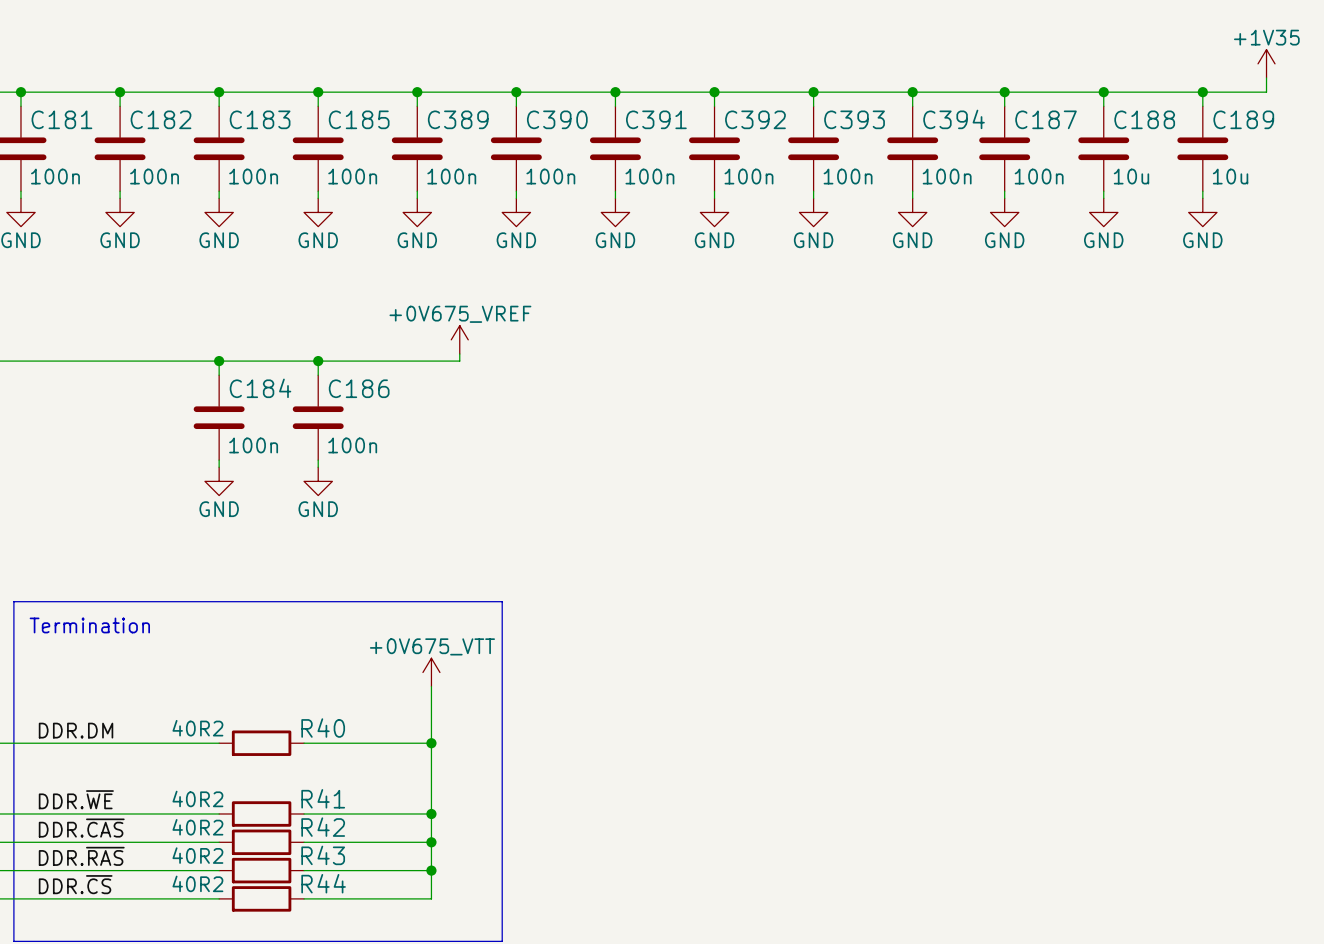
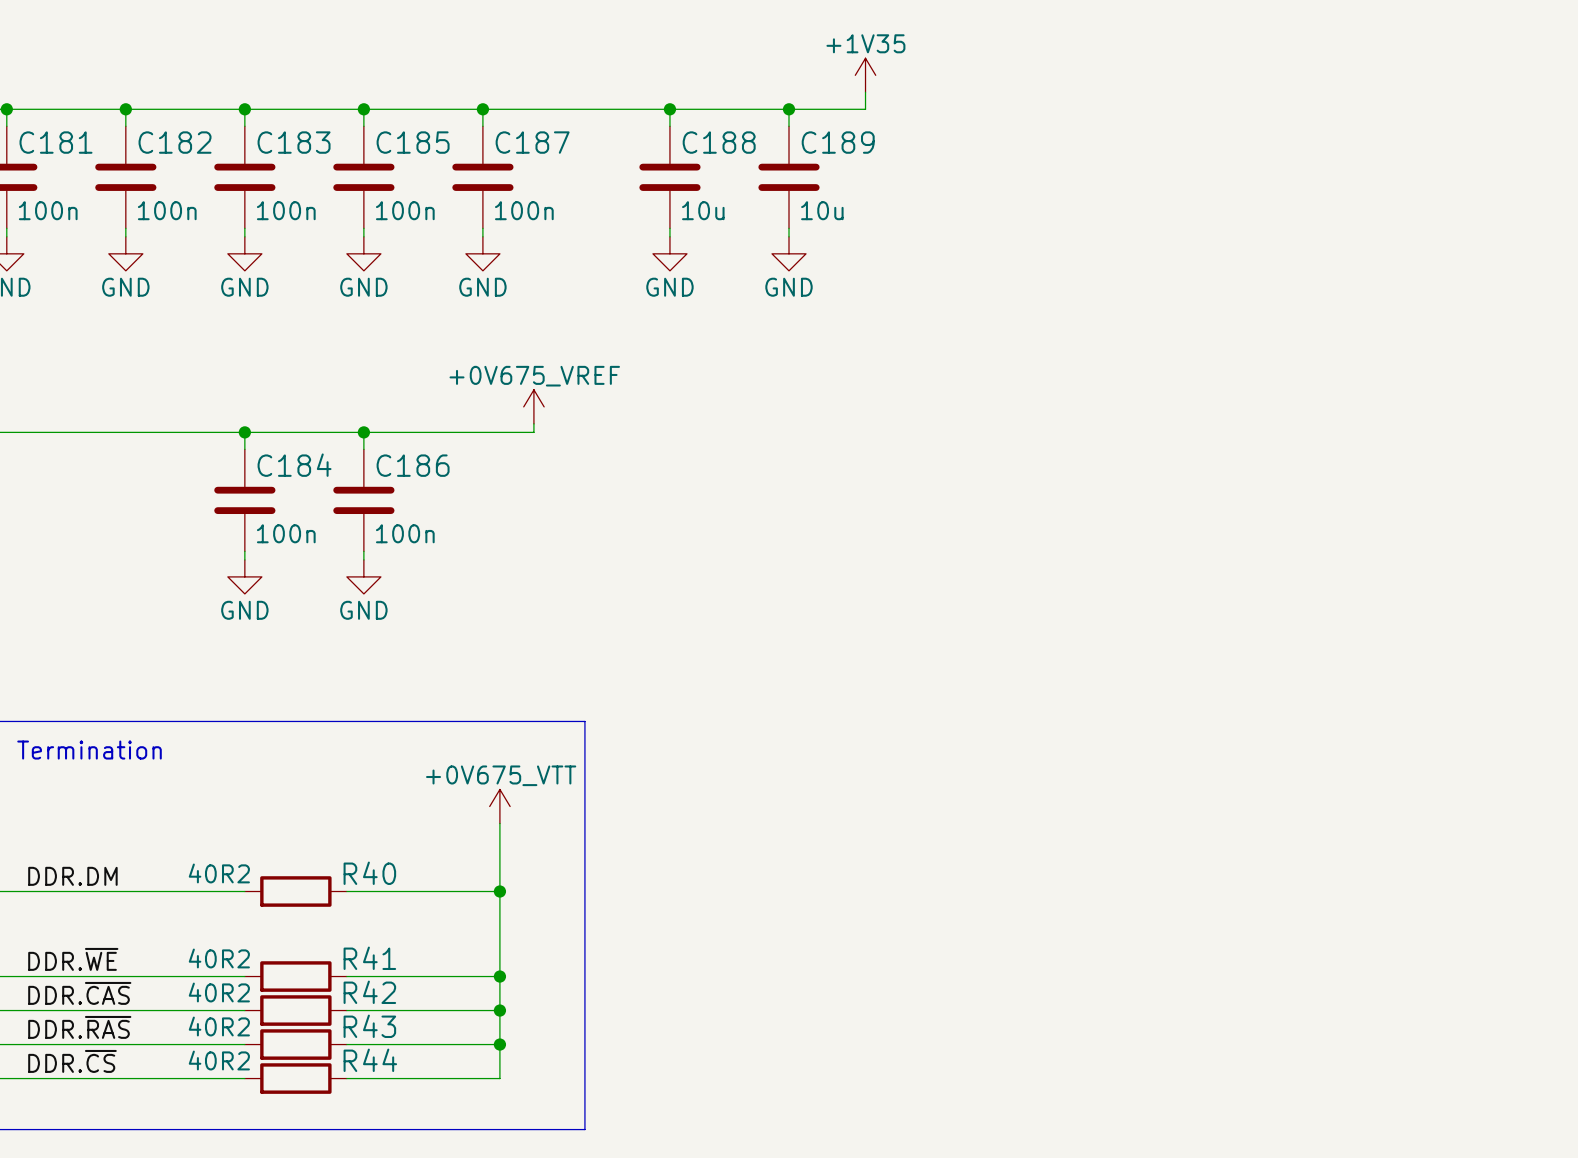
power symbol: none -> +1V35 (865, 75)
power symbol: +1V35 (1266, 63) -> none
wire: (1266, 78) (1266, 92) (735, 92) -> (865, 92) (865, 109)
wire: (516, 92) (516, 106) -> none
junction: (516, 92) -> none
junction: none -> (669, 109)
wire: (615, 92) (615, 106) -> (669, 109) (669, 126)
junction: (615, 92) -> none
junction: none -> (789, 109)
wire: (714, 92) (714, 106) -> (789, 109) (789, 126)
junction: (714, 92) -> none
wire: (813, 92) (813, 106) -> none
junction: (813, 92) -> none
wire: (912, 92) (912, 106) -> none
junction: (912, 92) -> none
wire: (1004, 92) (1004, 106) -> none
junction: (1004, 92) -> none
wire: (1103, 92) (1103, 106) -> none
junction: (1103, 92) -> none
wire: (1202, 92) (1202, 106) -> none
junction: (1202, 92) -> none
C389 name: C389 (458, 119) -> C187 (532, 142)
C390: (516, 148) -> none
C391: (615, 148) -> none
C392: (714, 148) -> none
C393: (813, 148) -> none
C394: (912, 148) -> none
C187: (1004, 148) -> none
C188 position: (1103, 148) -> (669, 177)
C189 position: (1202, 148) -> (789, 177)
wire: (516, 191) (516, 198) -> none
wire: (615, 191) (615, 198) -> (669, 228) (669, 236)
wire: (714, 191) (714, 198) -> (789, 228) (789, 236)
wire: (813, 191) (813, 198) -> none
wire: (912, 191) (912, 198) -> none
wire: (1004, 191) (1004, 198) -> none
wire: (1103, 191) (1103, 198) -> none
wire: (1202, 191) (1202, 198) -> none
power symbol: GND (516, 212) -> none
power symbol: none -> GND (669, 253)
power symbol: GND (615, 212) -> none
power symbol: none -> GND (789, 253)
power symbol: GND (714, 212) -> none
power symbol: GND (813, 212) -> none
power symbol: GND (912, 212) -> none
power symbol: GND (1004, 212) -> none
power symbol: GND (1103, 212) -> none
power symbol: GND (1202, 212) -> none

